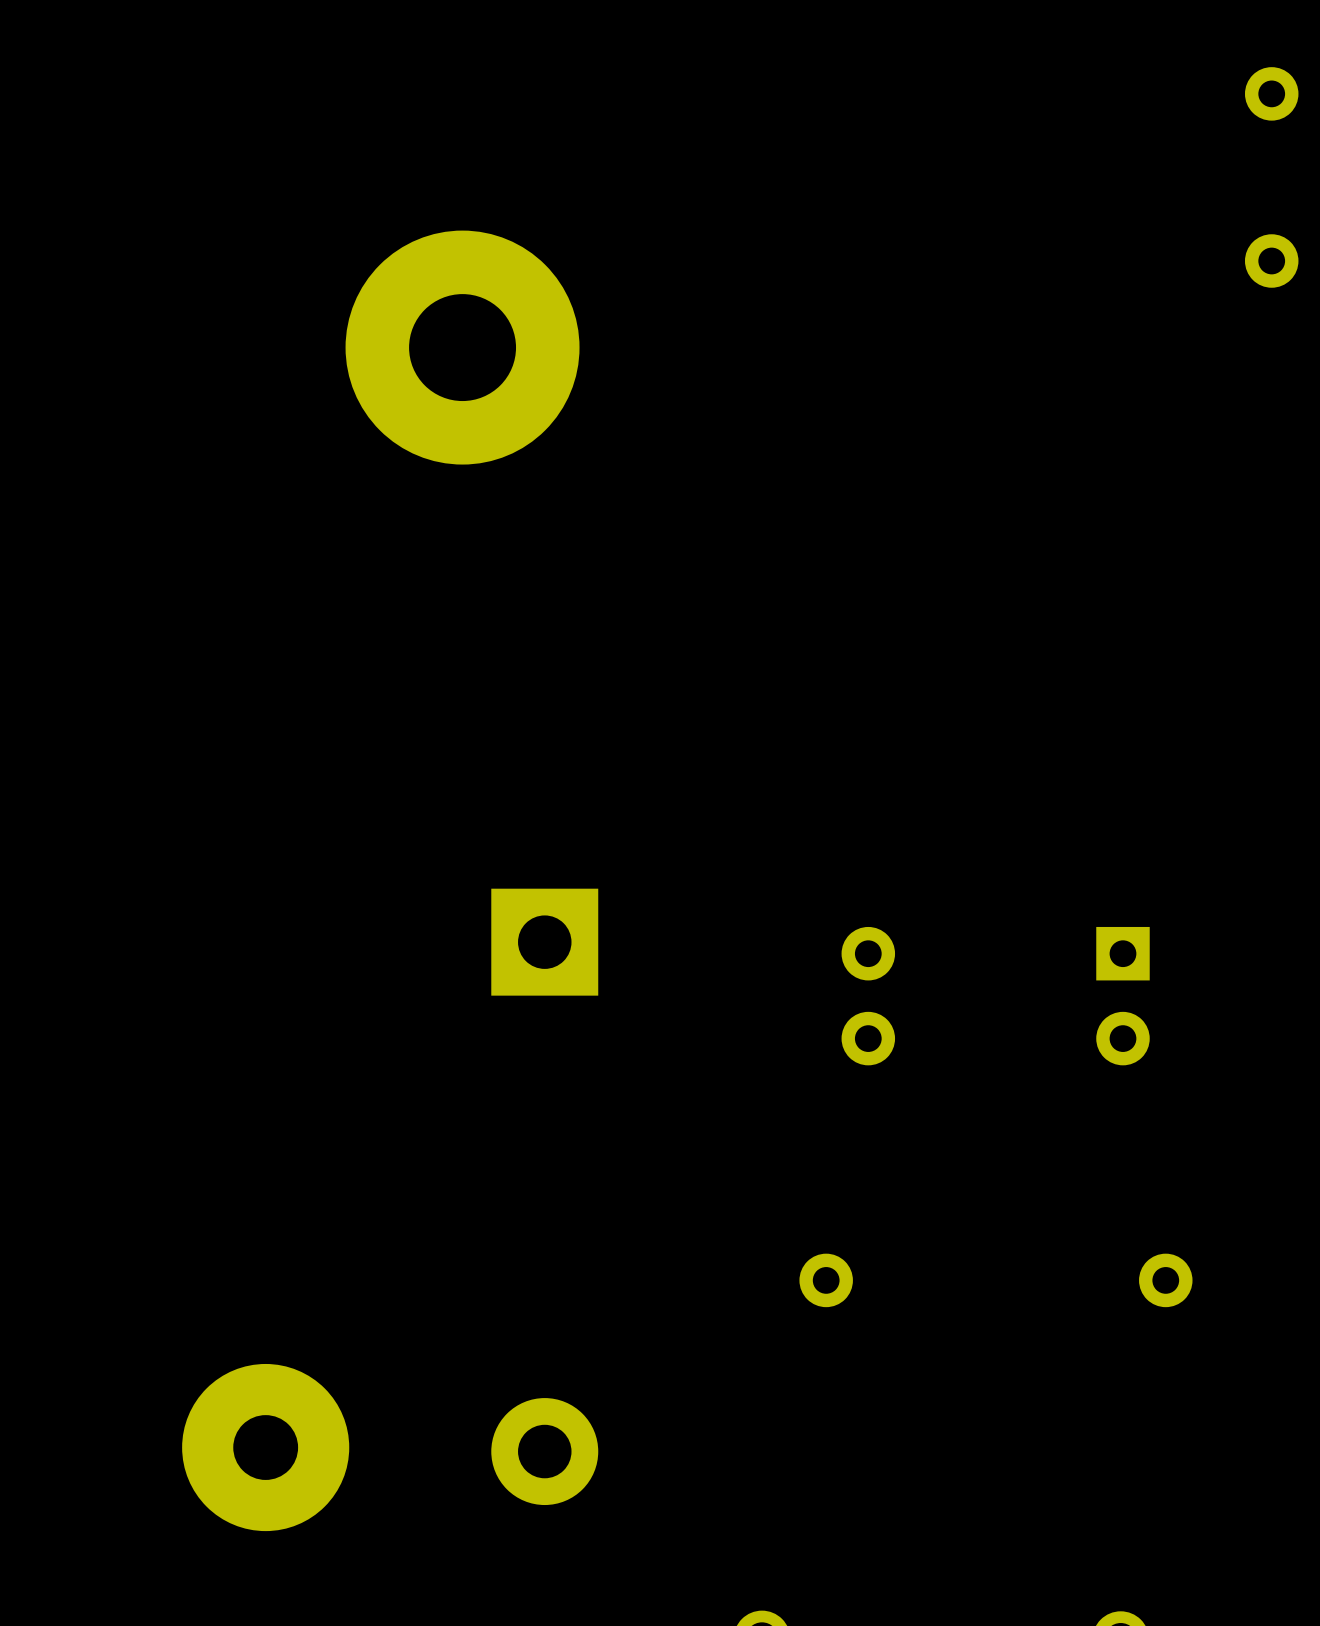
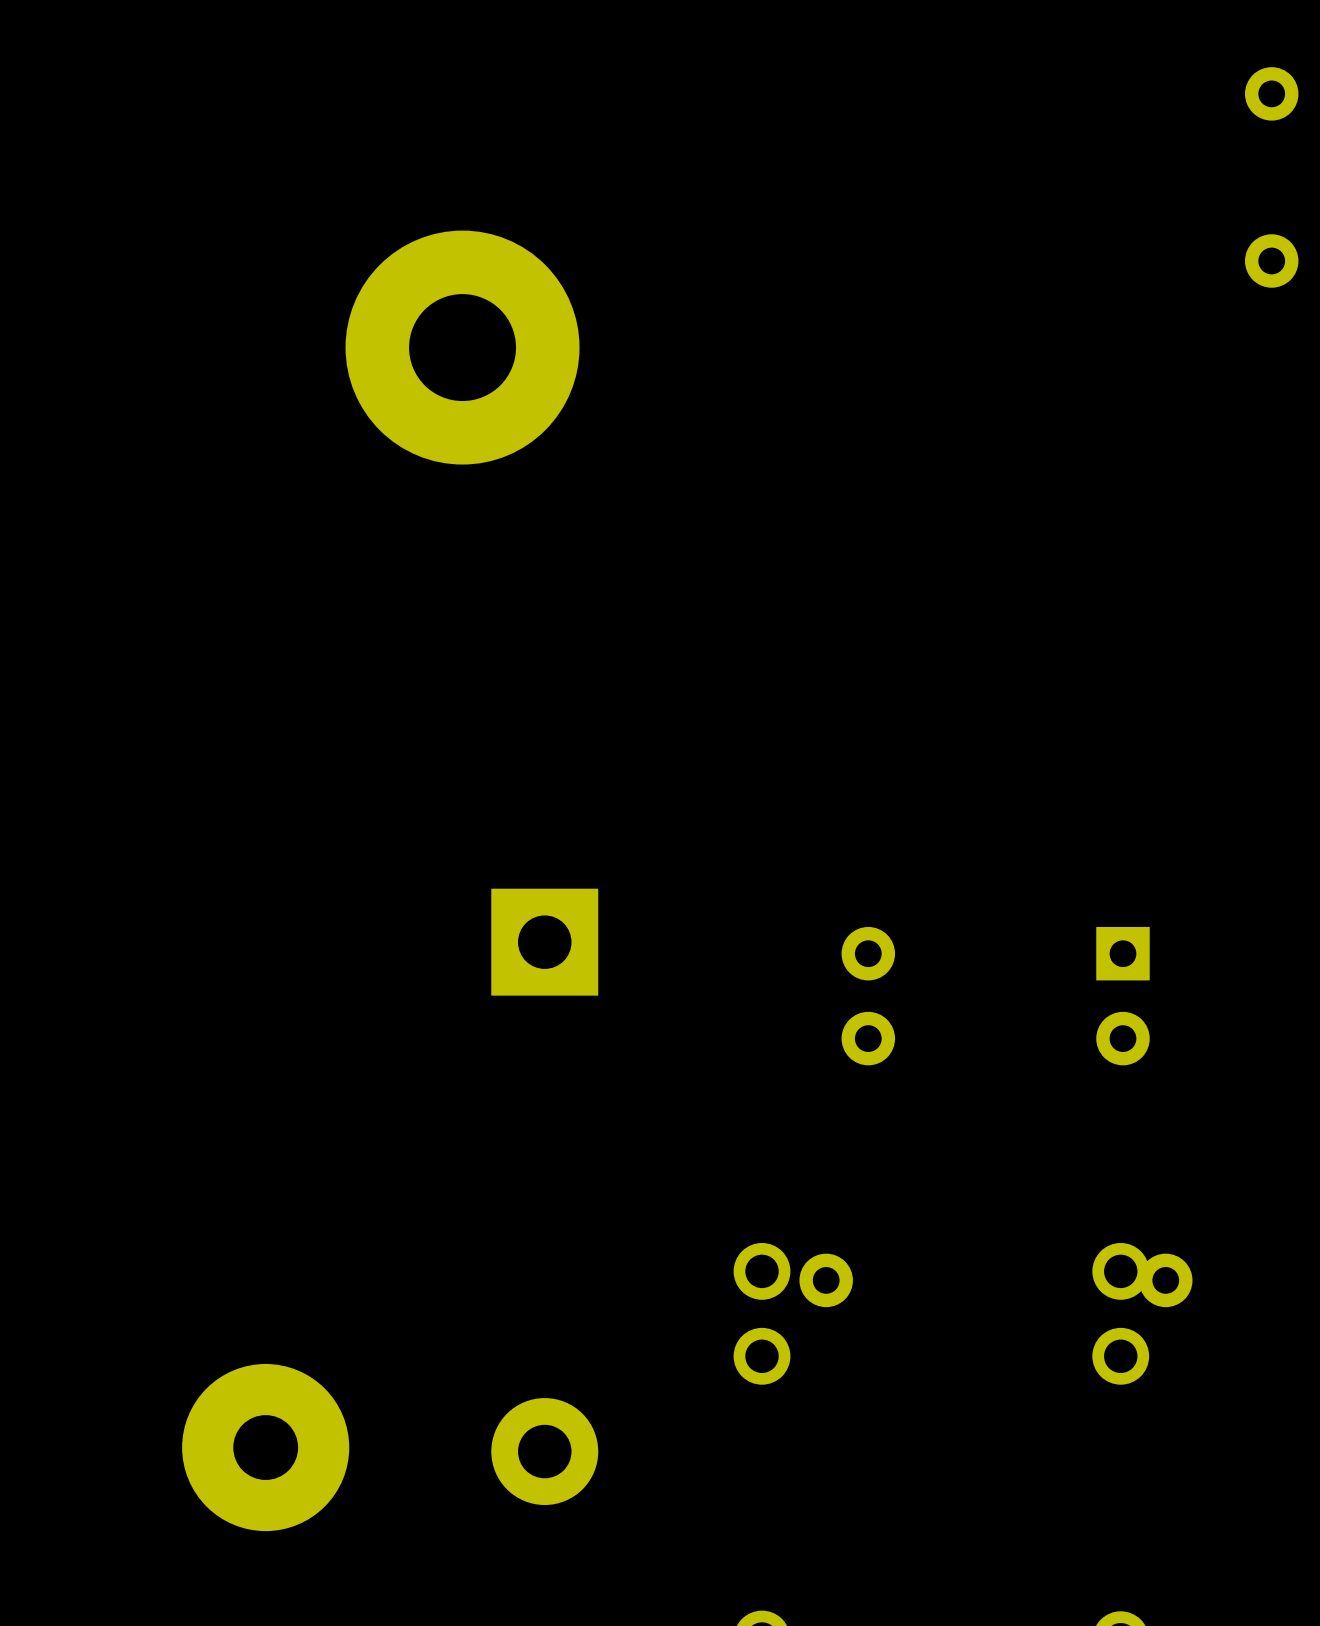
part: none -> (762, 1313)
part: none -> (1120, 1313)

